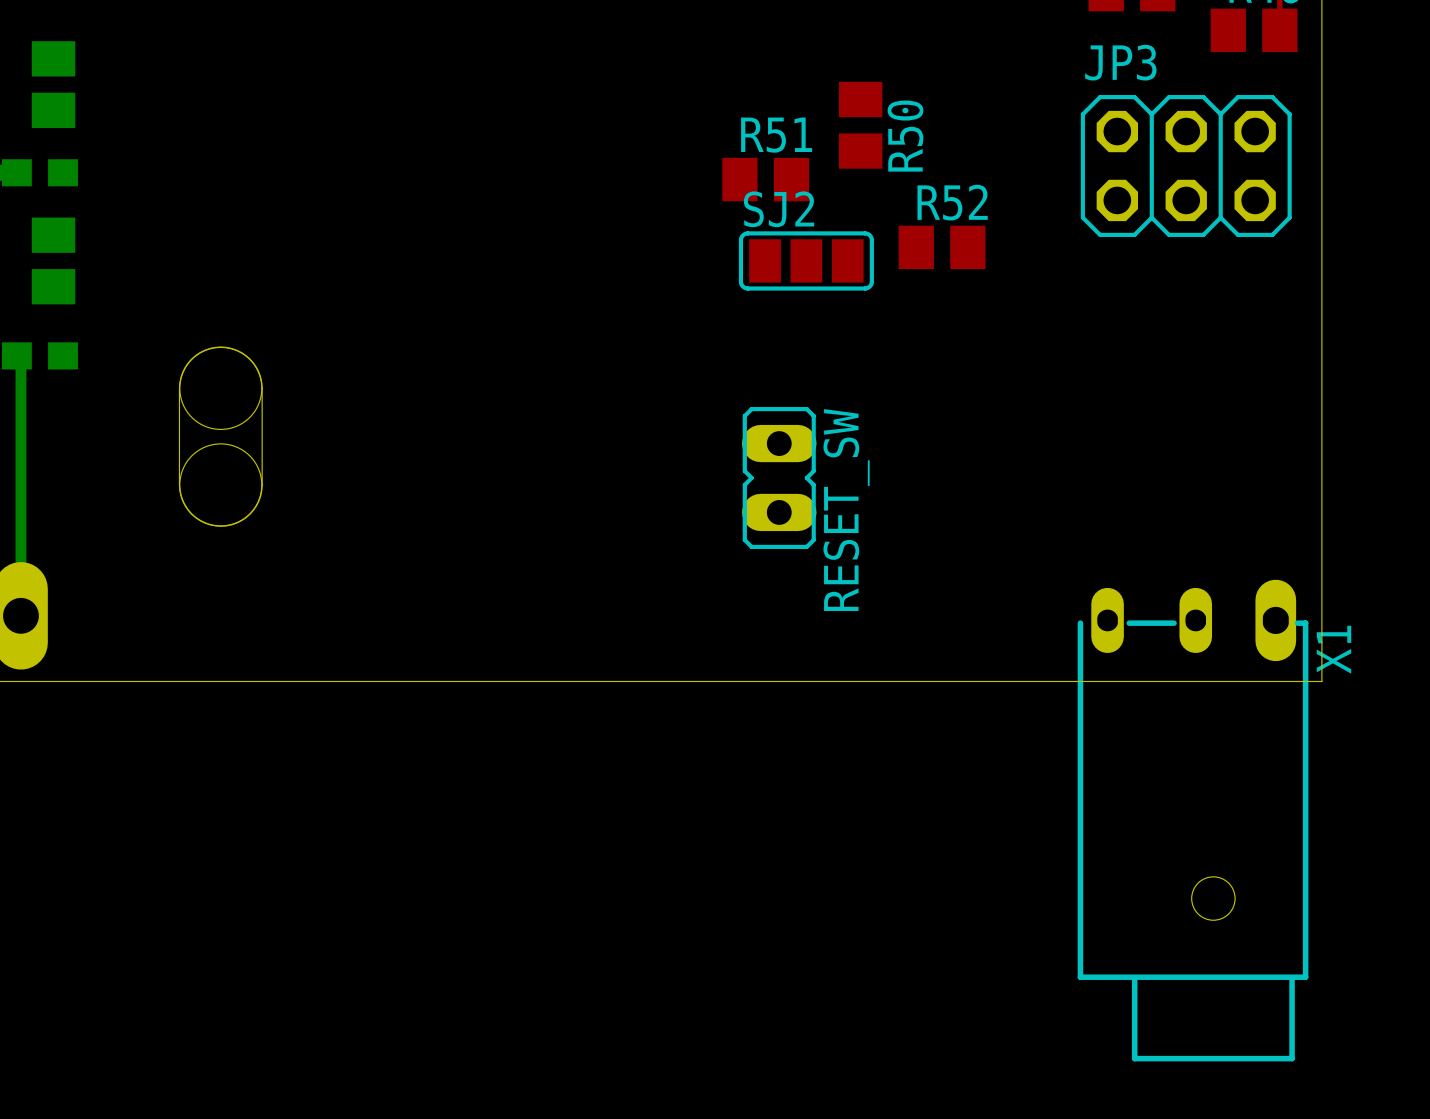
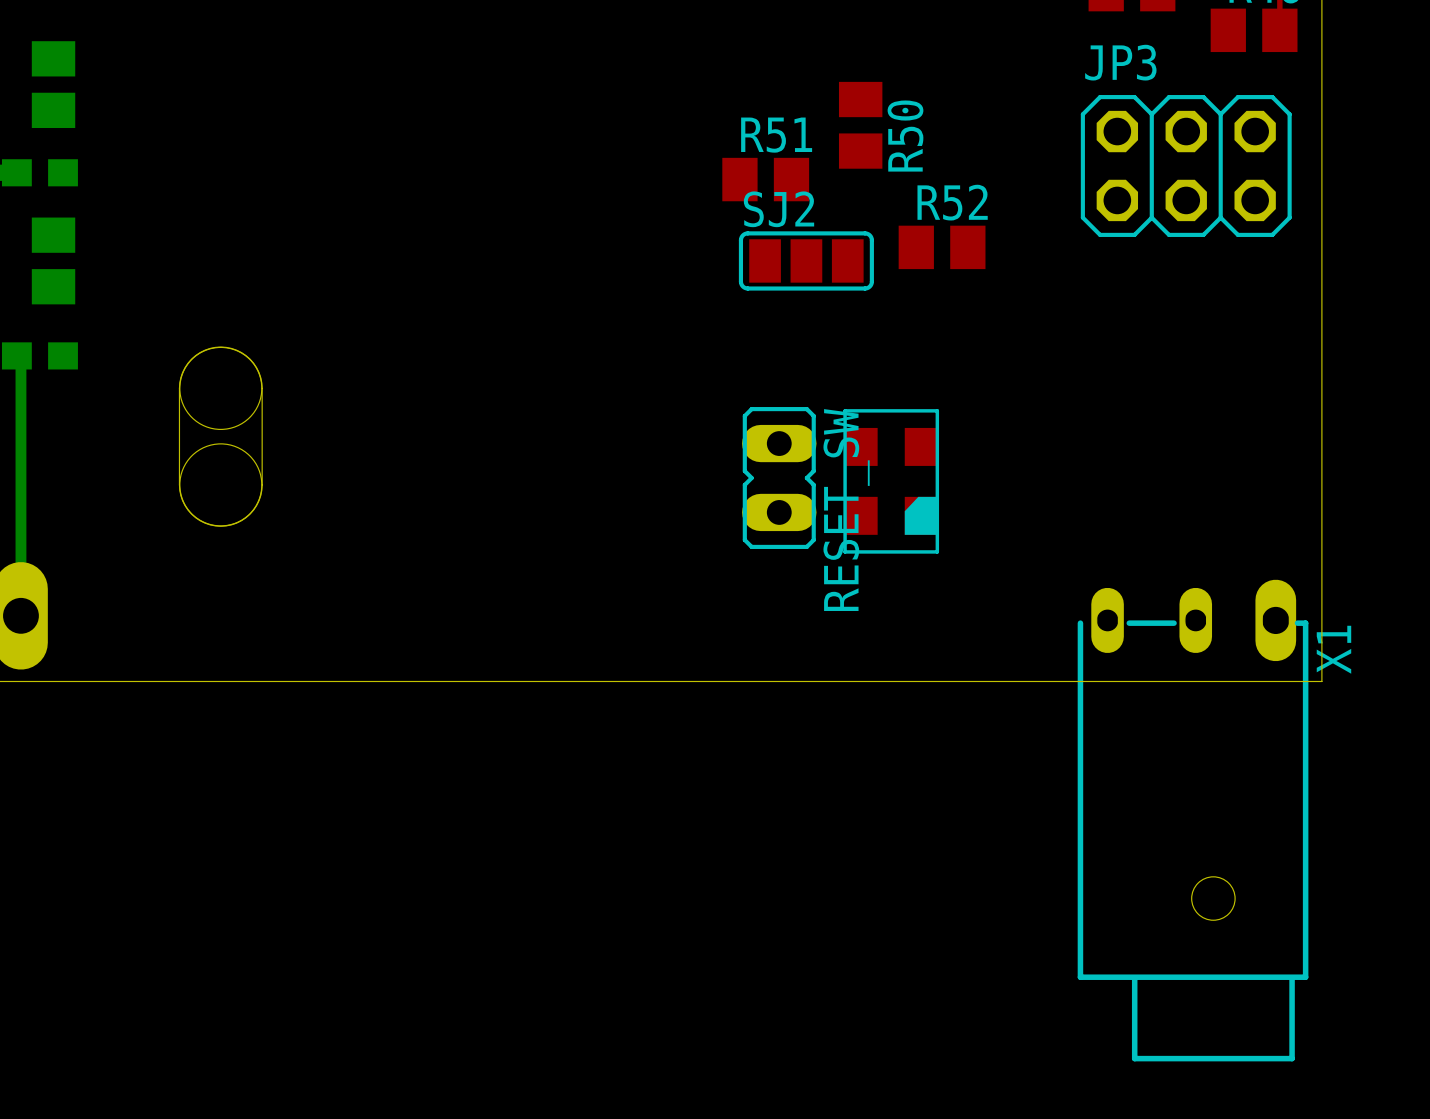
part: none -> (891, 481)

